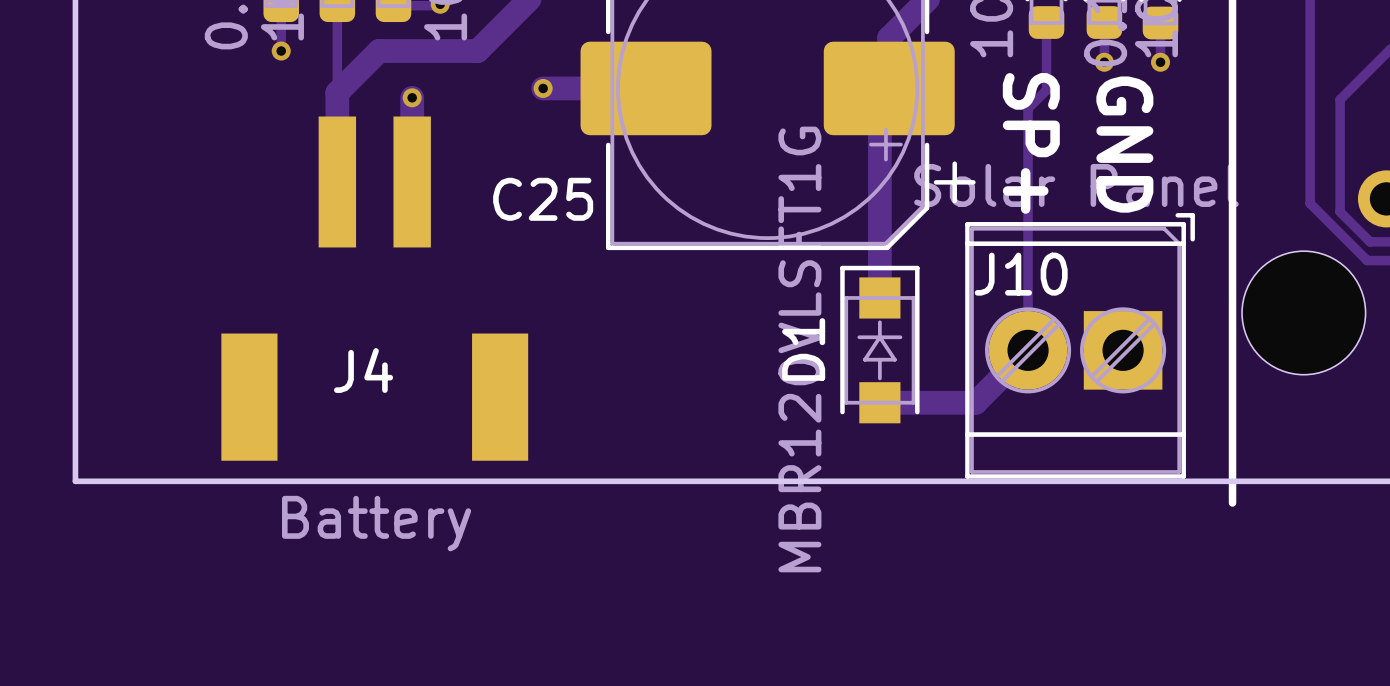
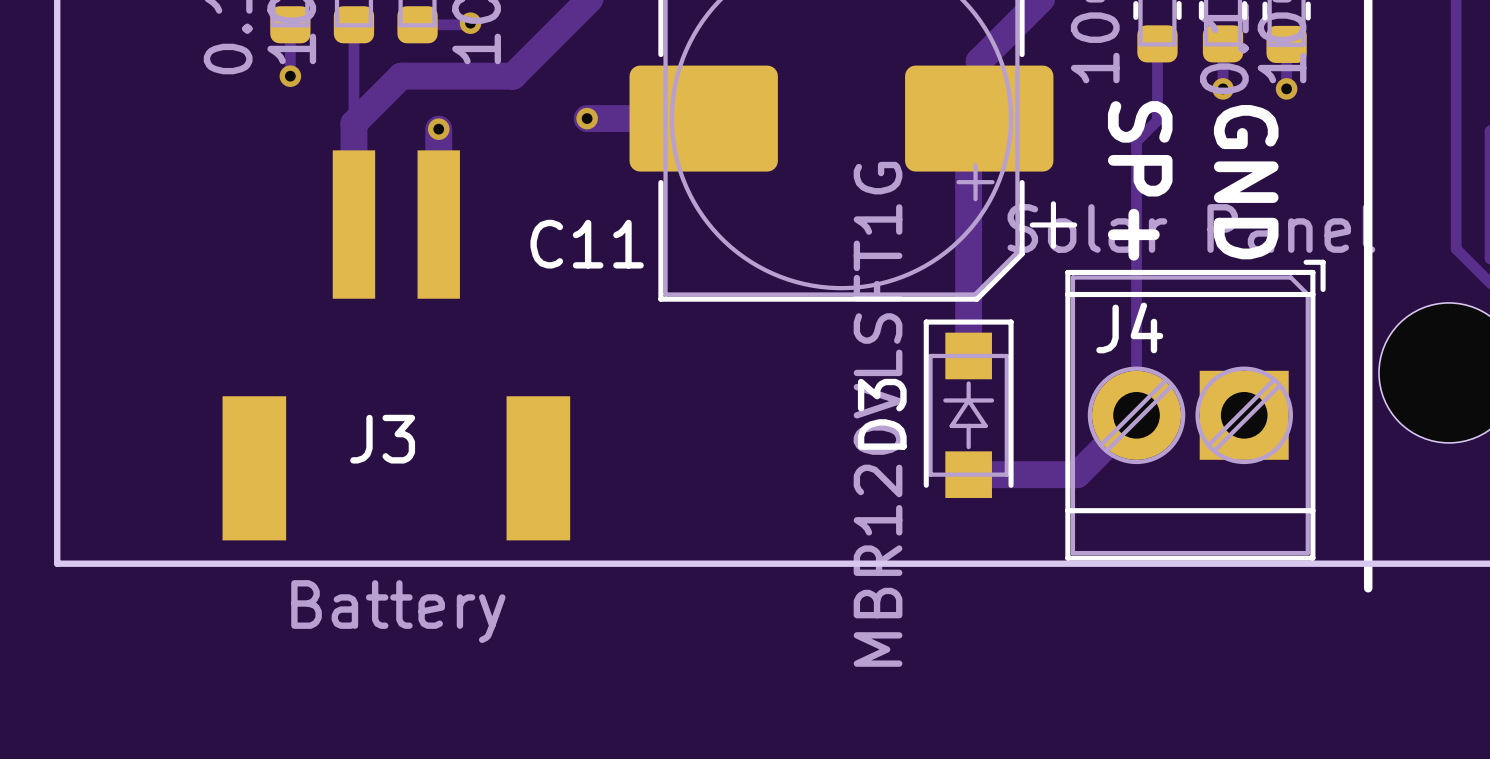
C25 name: C25 (543, 199) -> C11 (587, 244)
J10 name: J10 (1021, 274) -> J4 (1129, 327)
D1 name: D1 (803, 349) -> D3 (882, 414)
J4 name: J4 (363, 370) -> J3 (382, 439)

